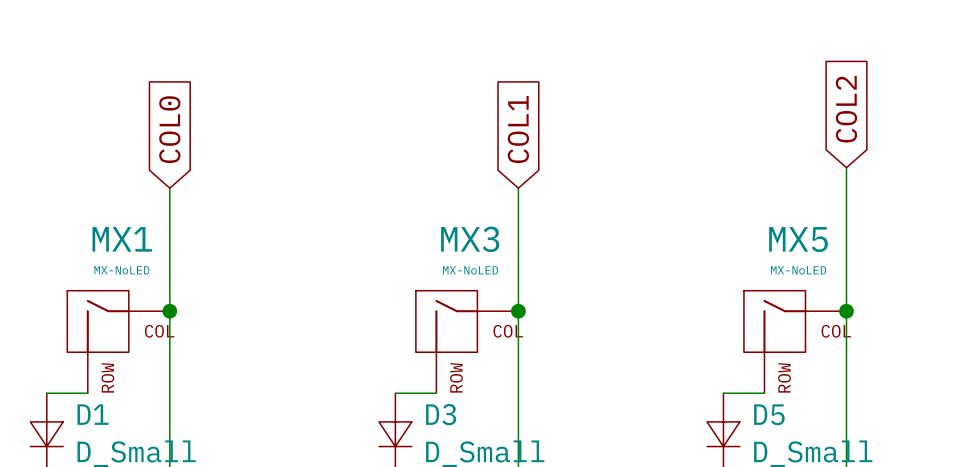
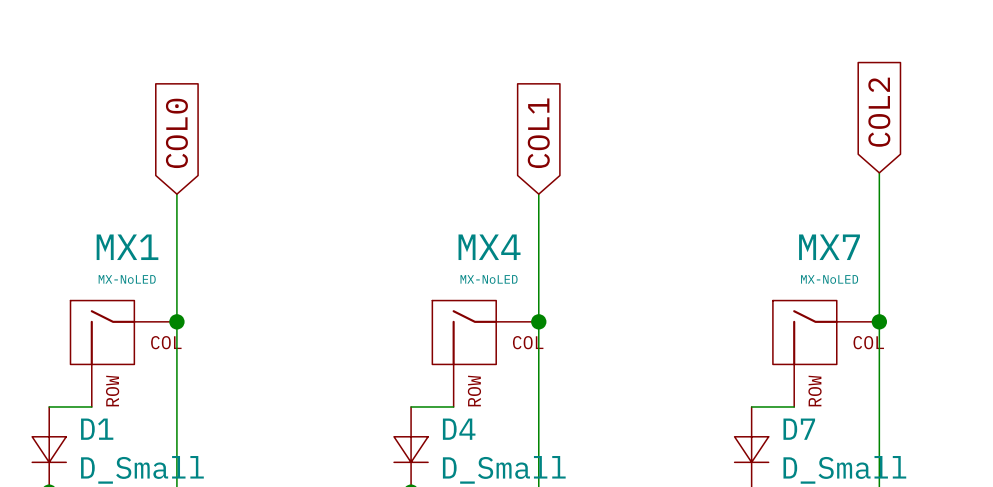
MX3 name: MX3 (470, 239) -> MX4 (489, 247)
MX5 name: MX5 (798, 239) -> MX7 (829, 247)
D3 name: D3 (441, 414) -> D4 (459, 429)
D5 name: D5 (769, 414) -> D7 (799, 429)

